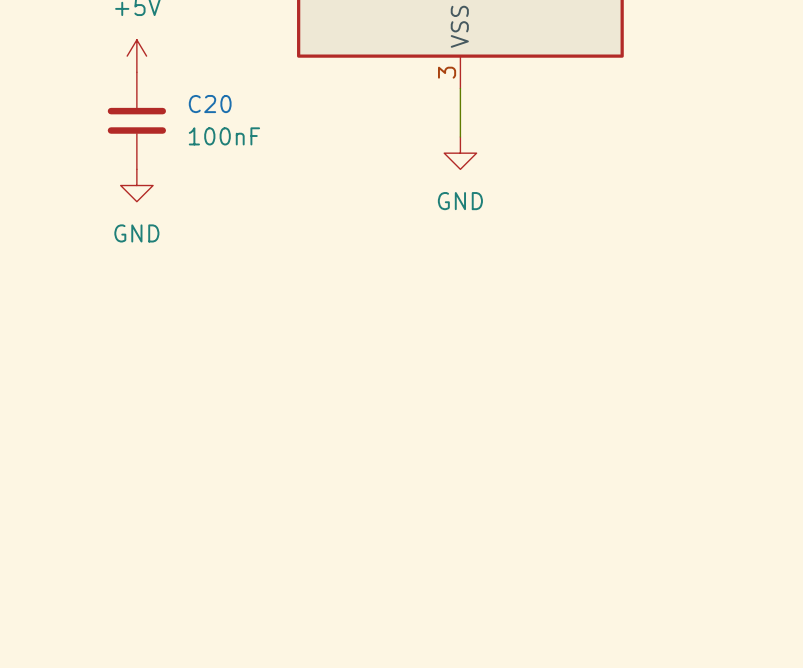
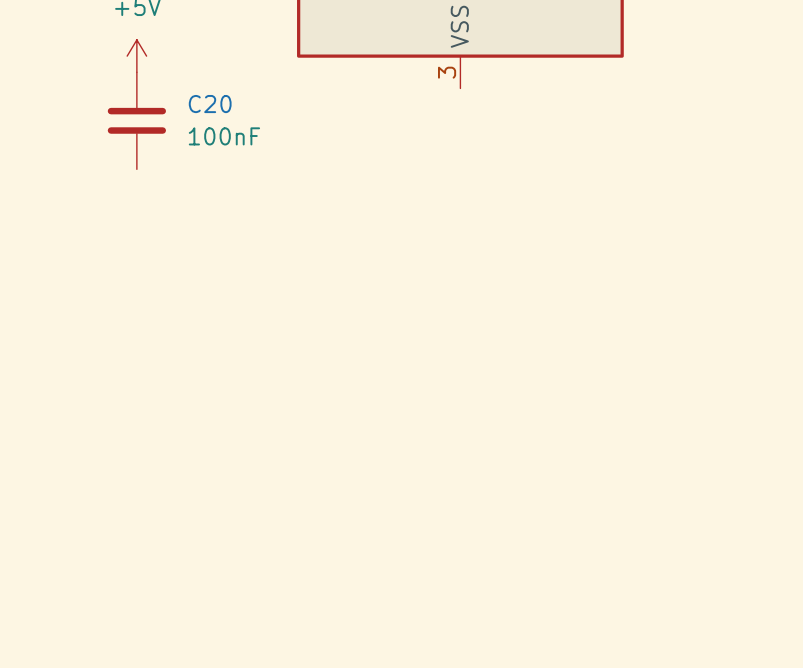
wire: (460, 88) (460, 136) -> none
power symbol: GND (460, 153) -> none
power symbol: GND (136, 185) -> none

